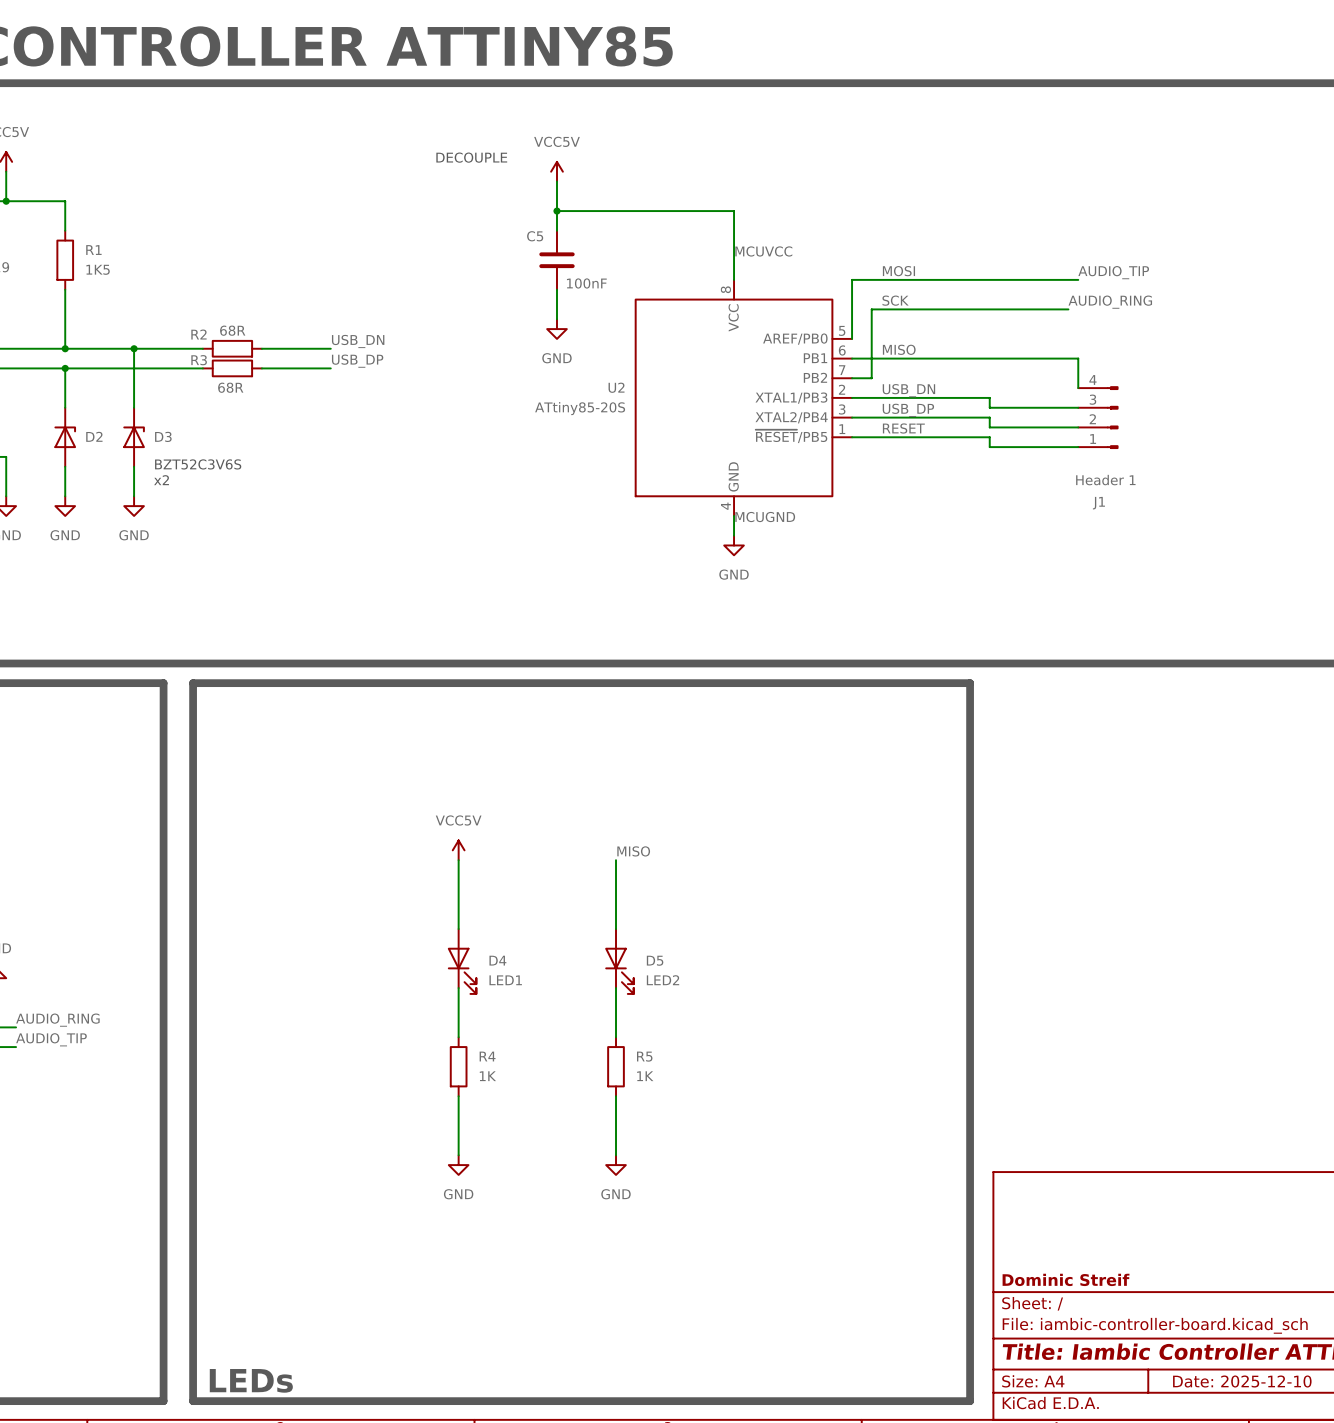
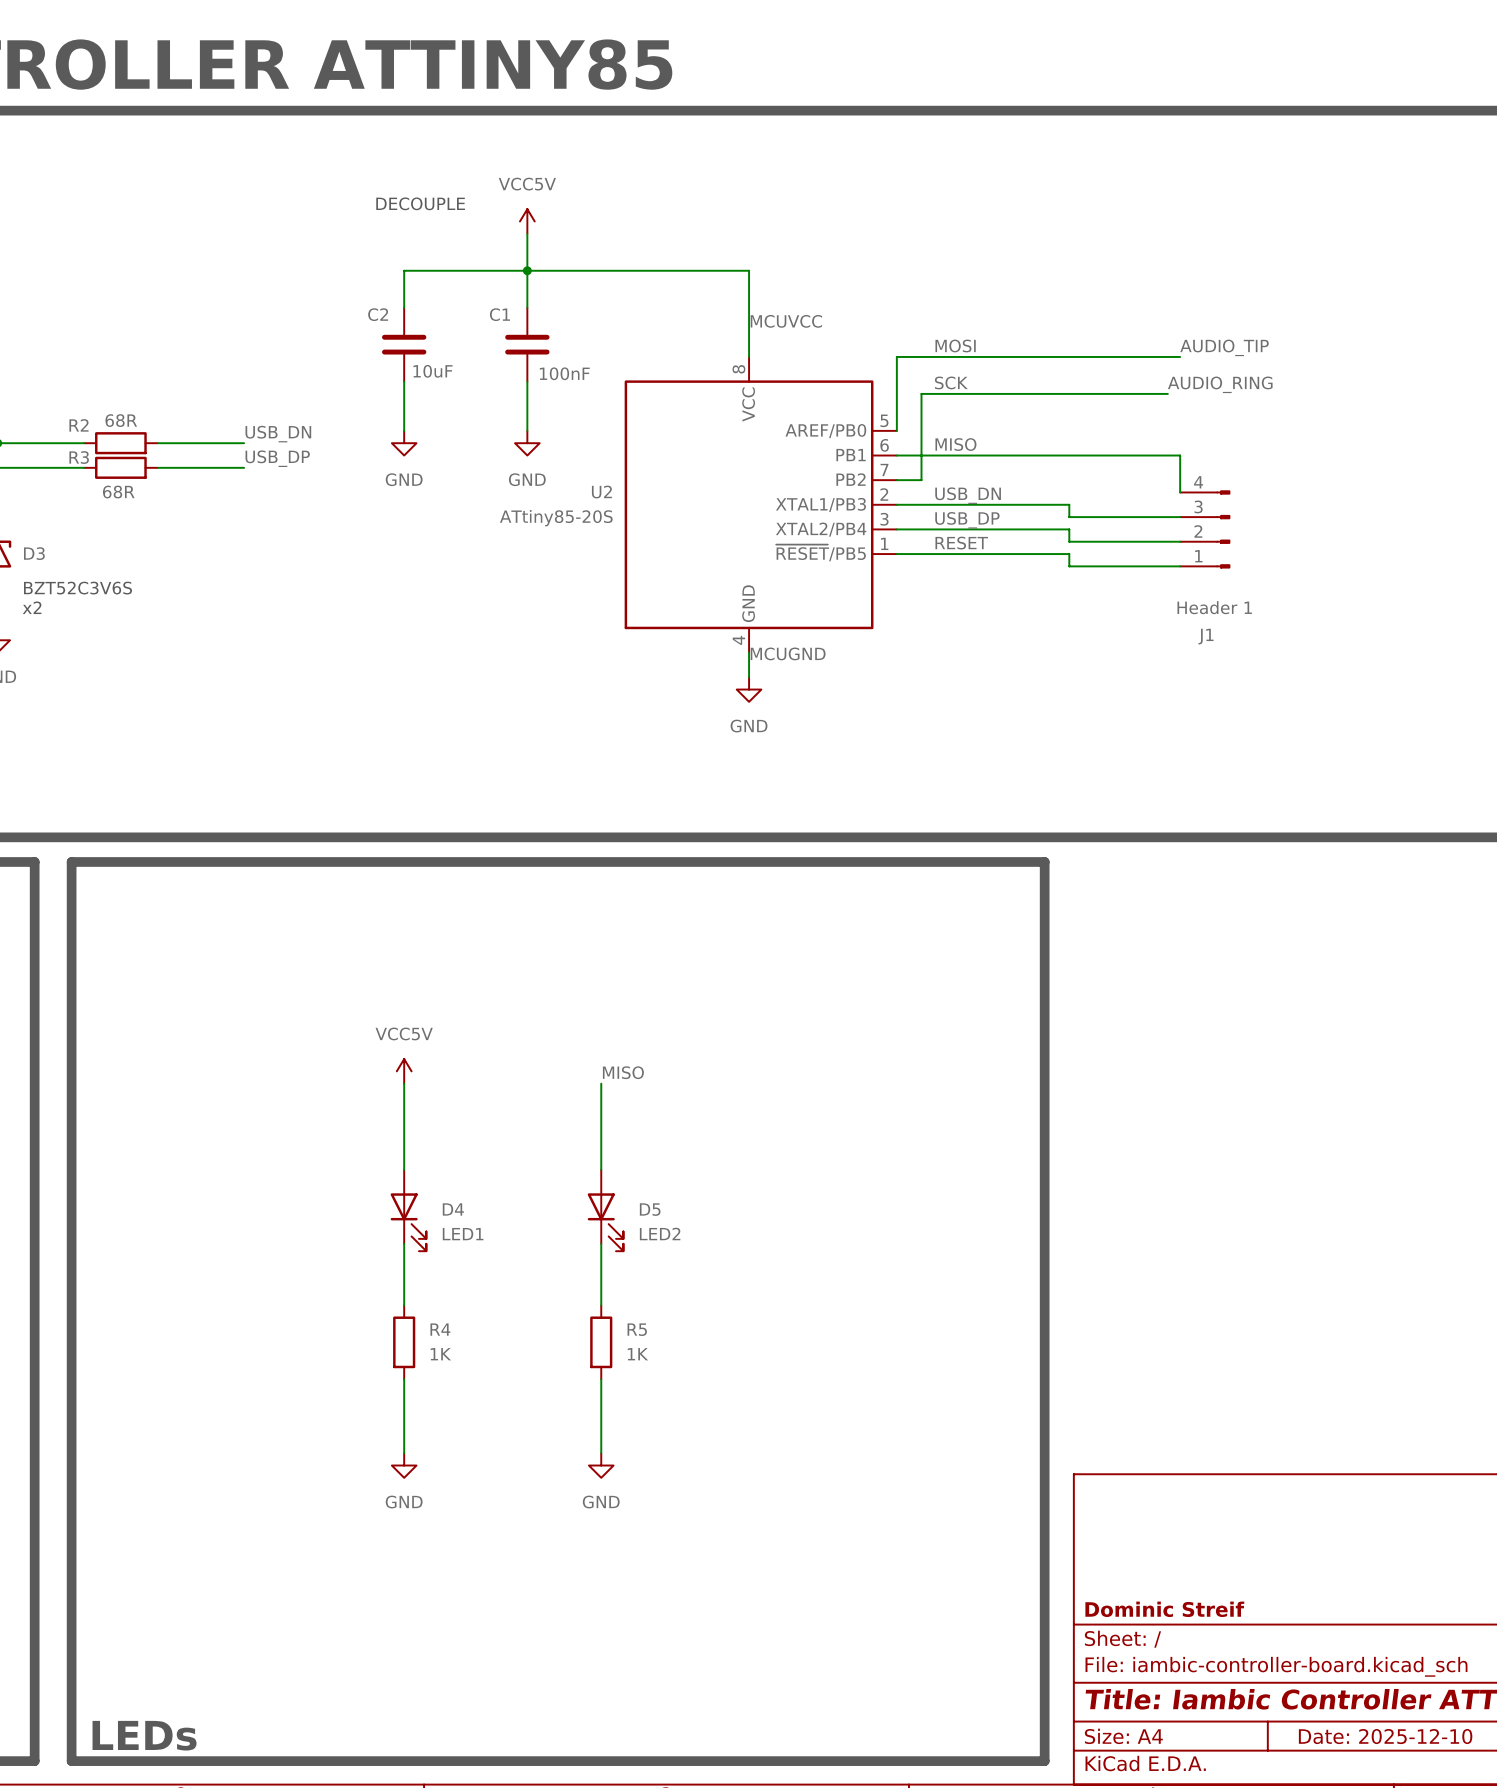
wire: none -> (527, 270) (404, 270) (404, 307)
C5: 100nF (556, 260) -> none
C2: none -> 10uF (404, 344)
C1: none -> 100nF (527, 344)
wire: none -> (404, 381) (404, 430)
power symbol position: GND (556, 329) -> GND (527, 443)
power symbol: none -> GND (404, 443)

